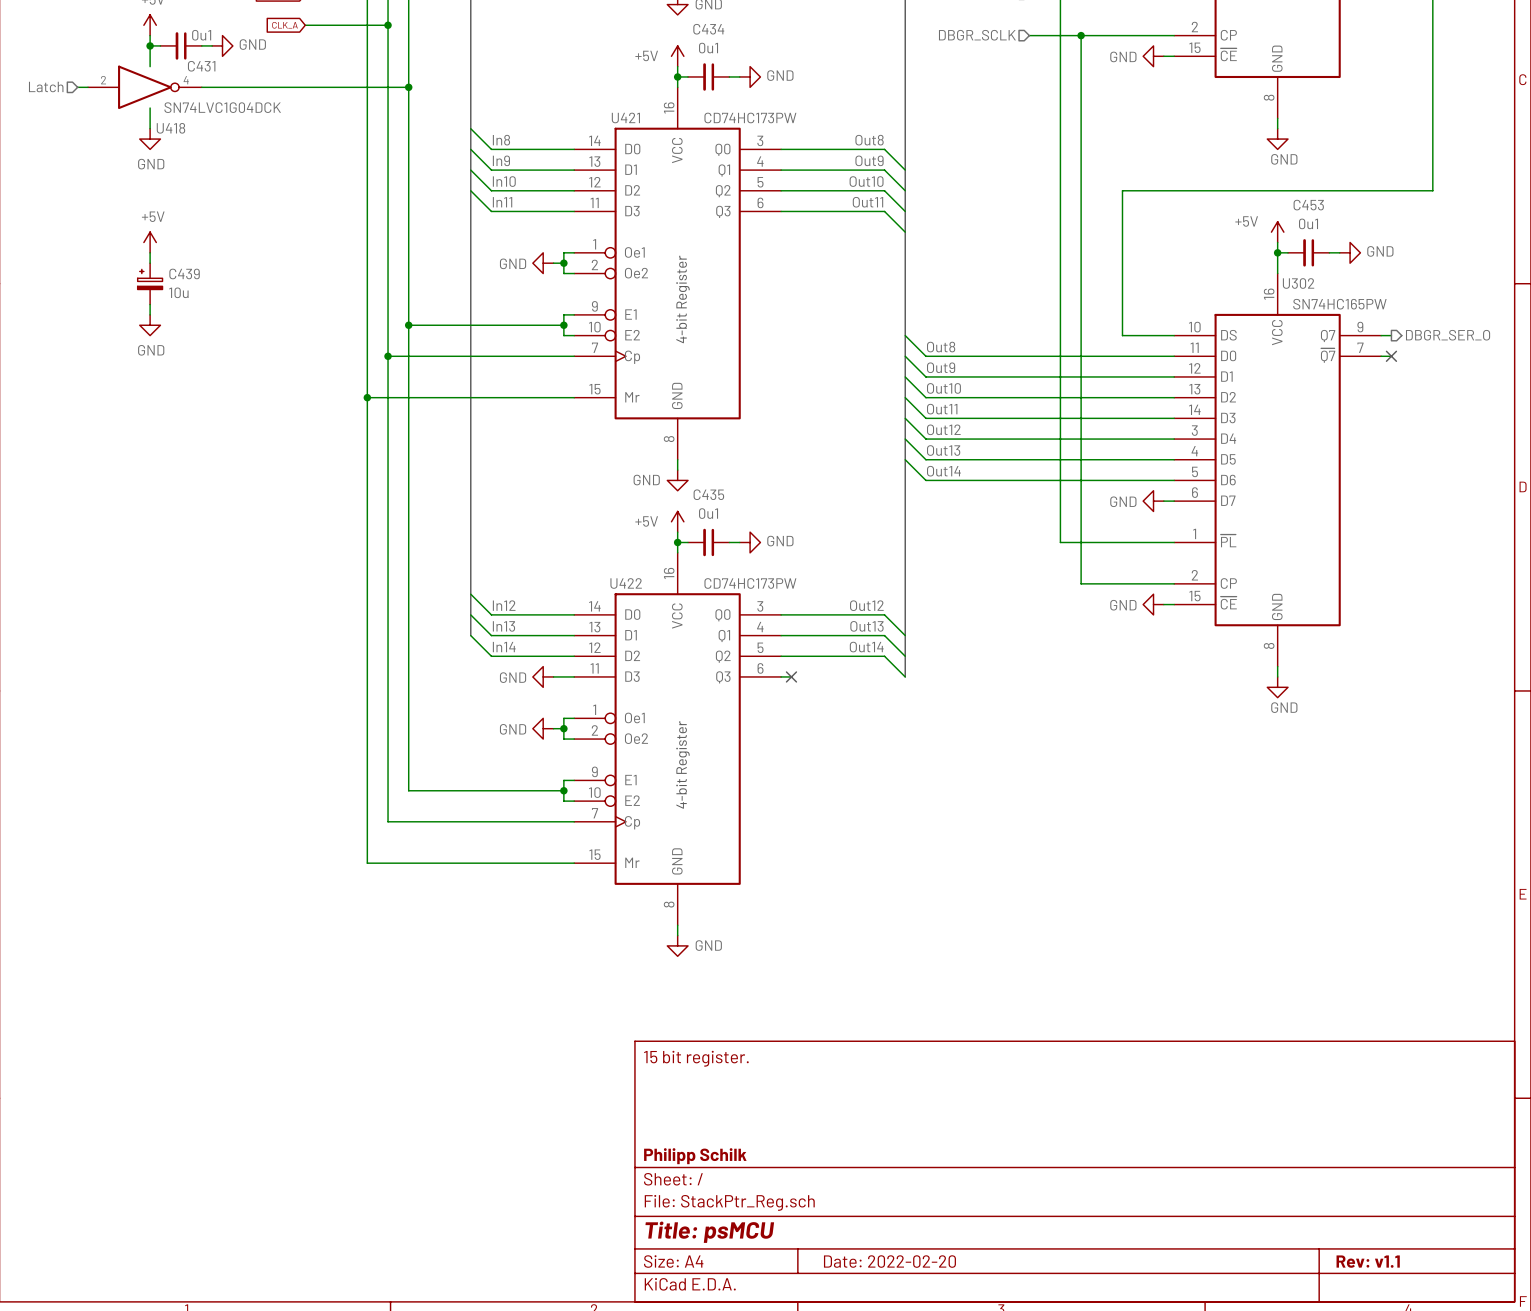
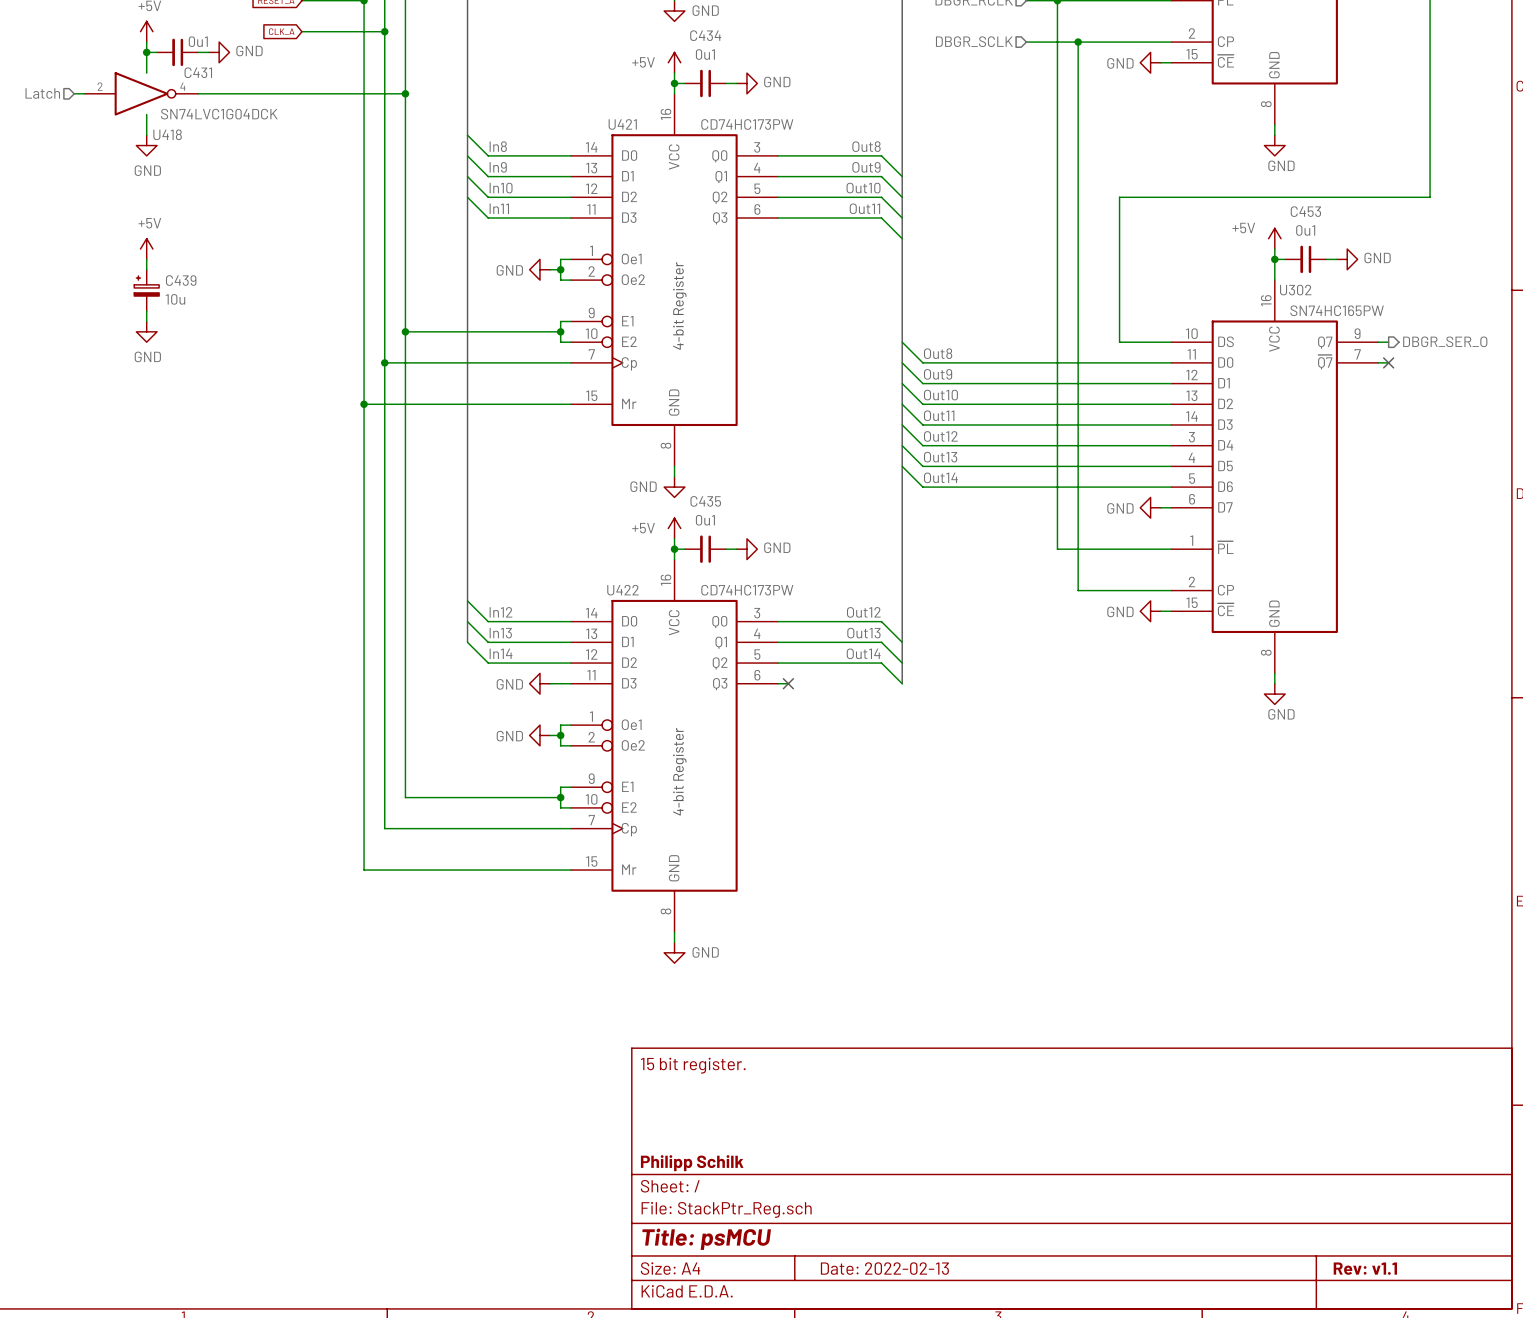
title block: Date: 2022-02-20 (889, 1261) -> Date: 2022-02-13 (884, 1268)

